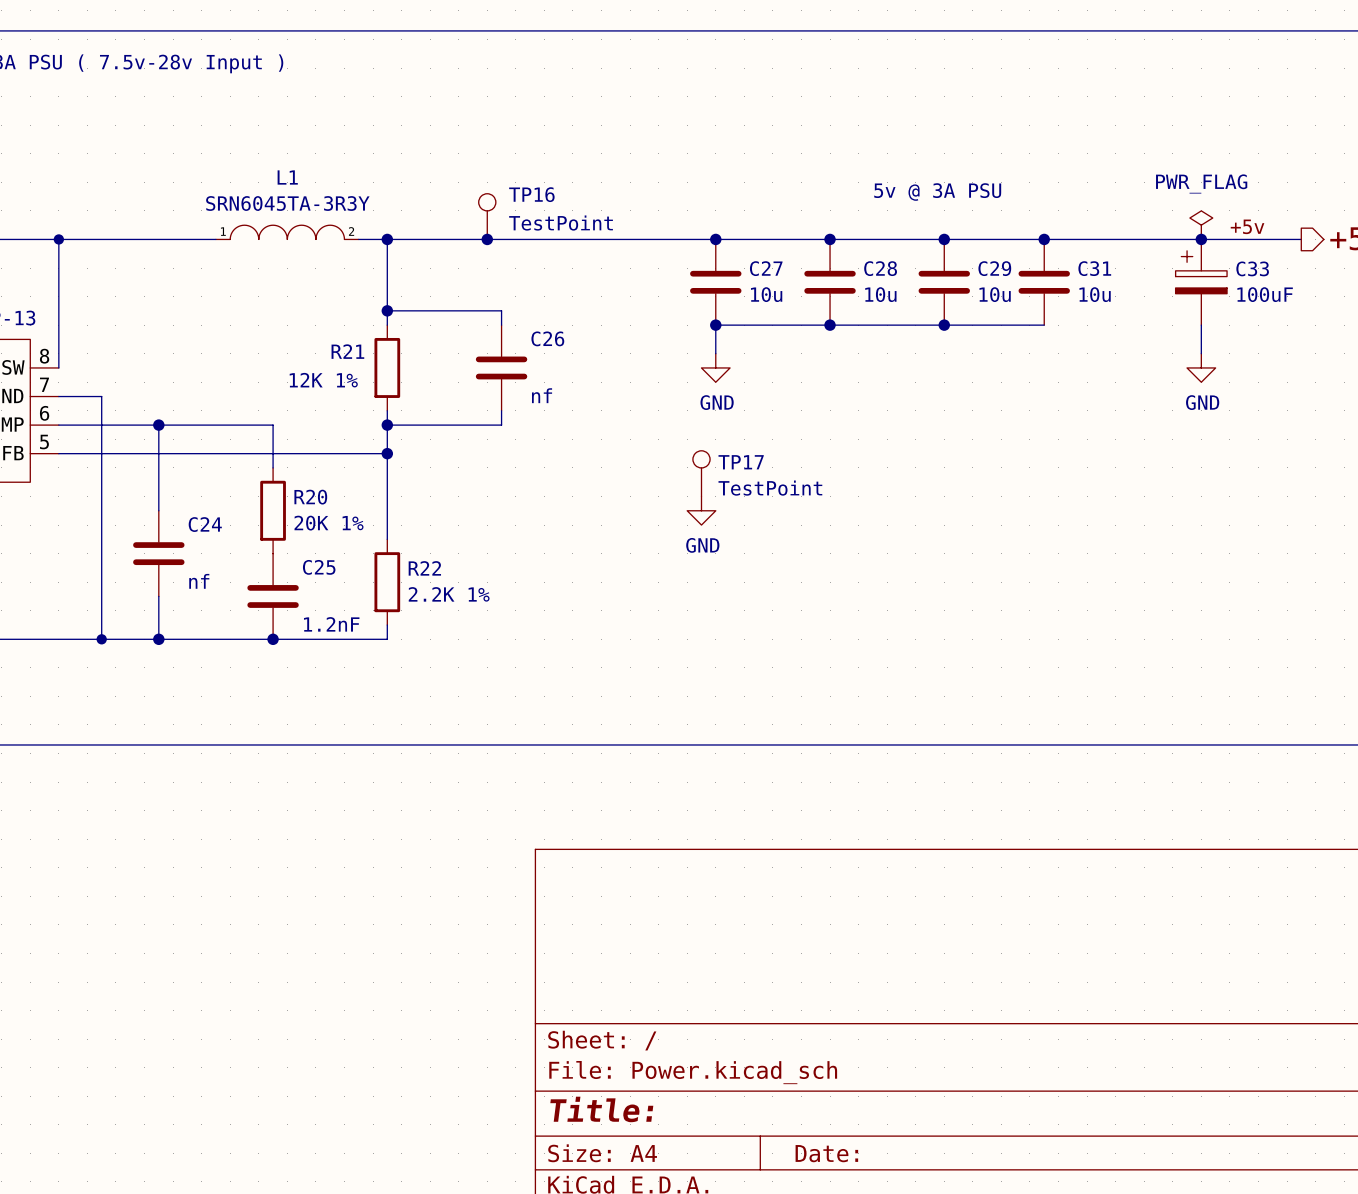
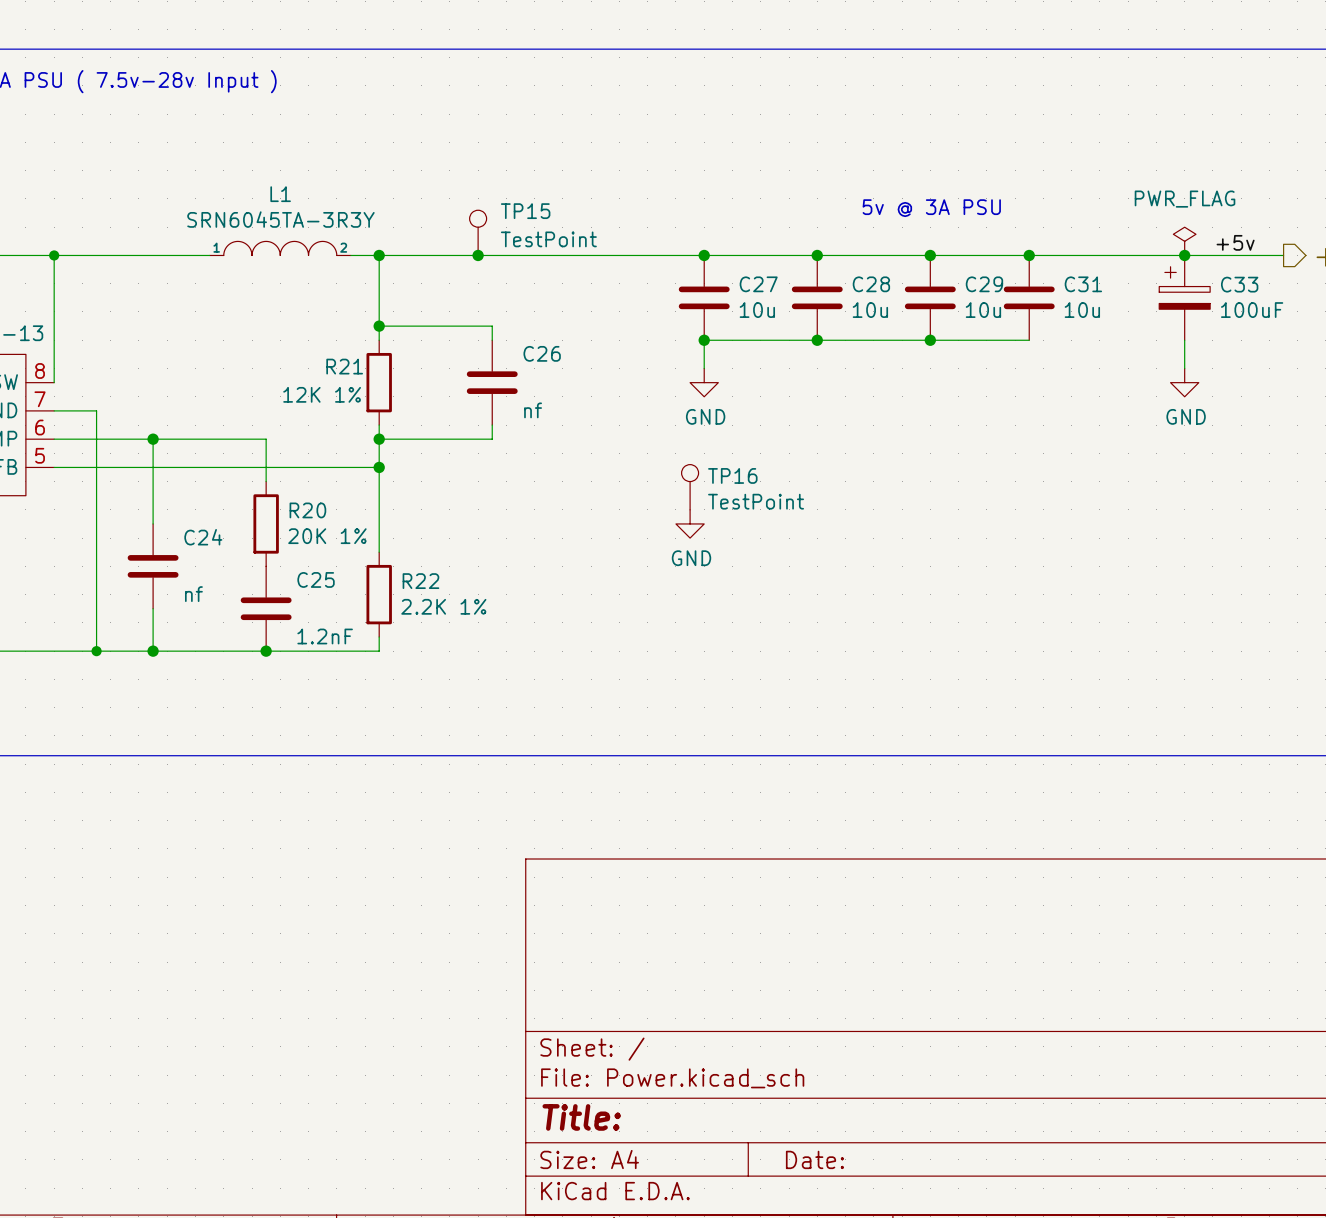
TP16 name: TP16 (531, 194) -> TP15 (525, 211)
TP17 name: TP17 (741, 462) -> TP16 (732, 475)

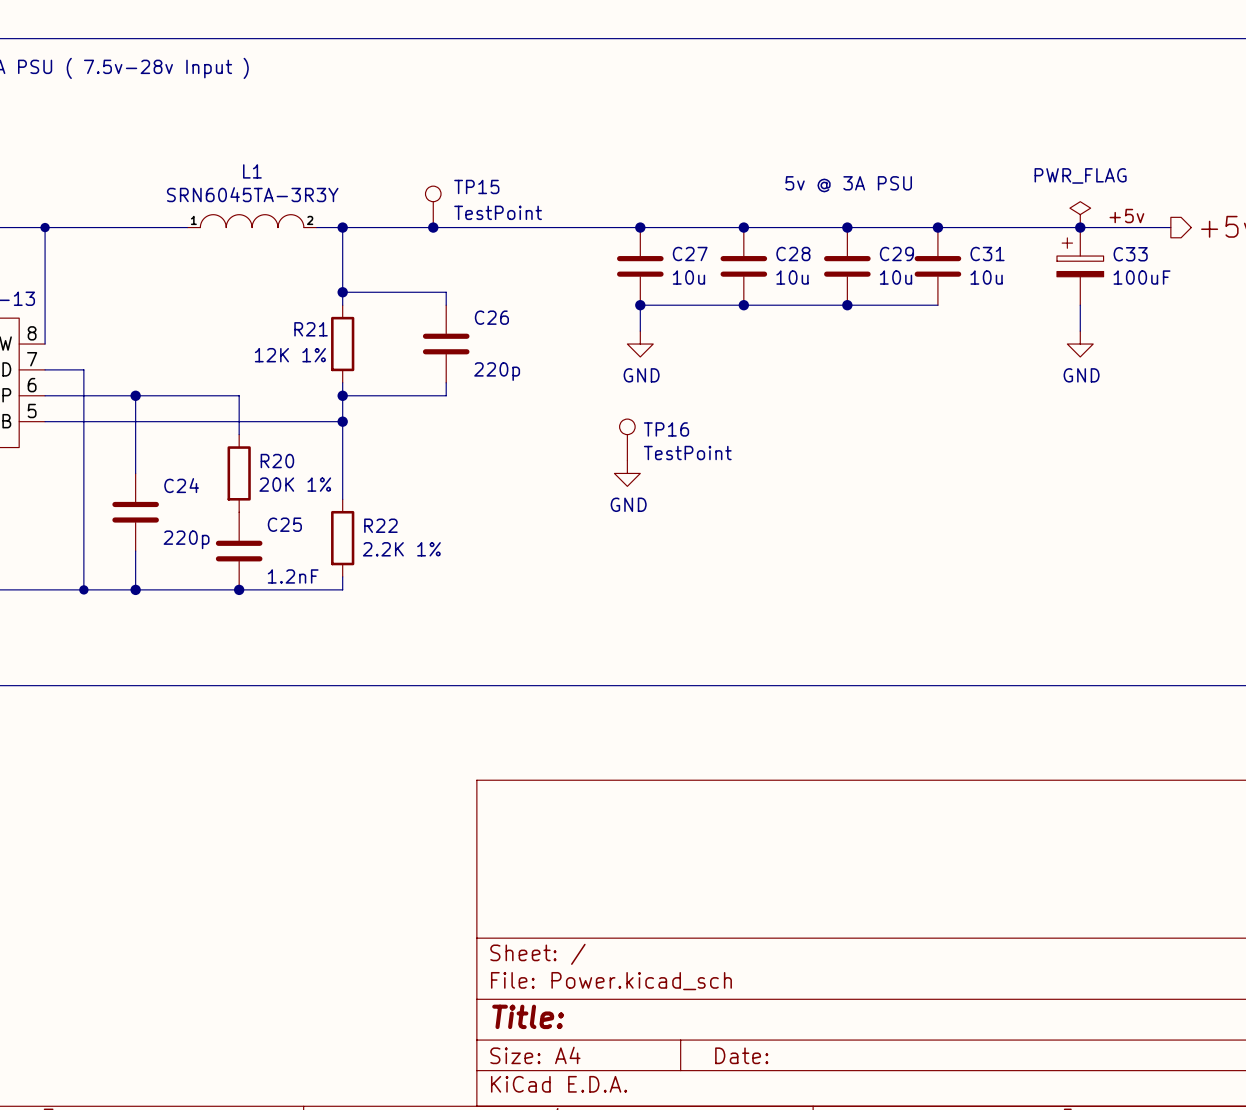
C26 value: nf (533, 410) -> 220p (497, 371)
C24 value: nf (193, 594) -> 220p (186, 539)

